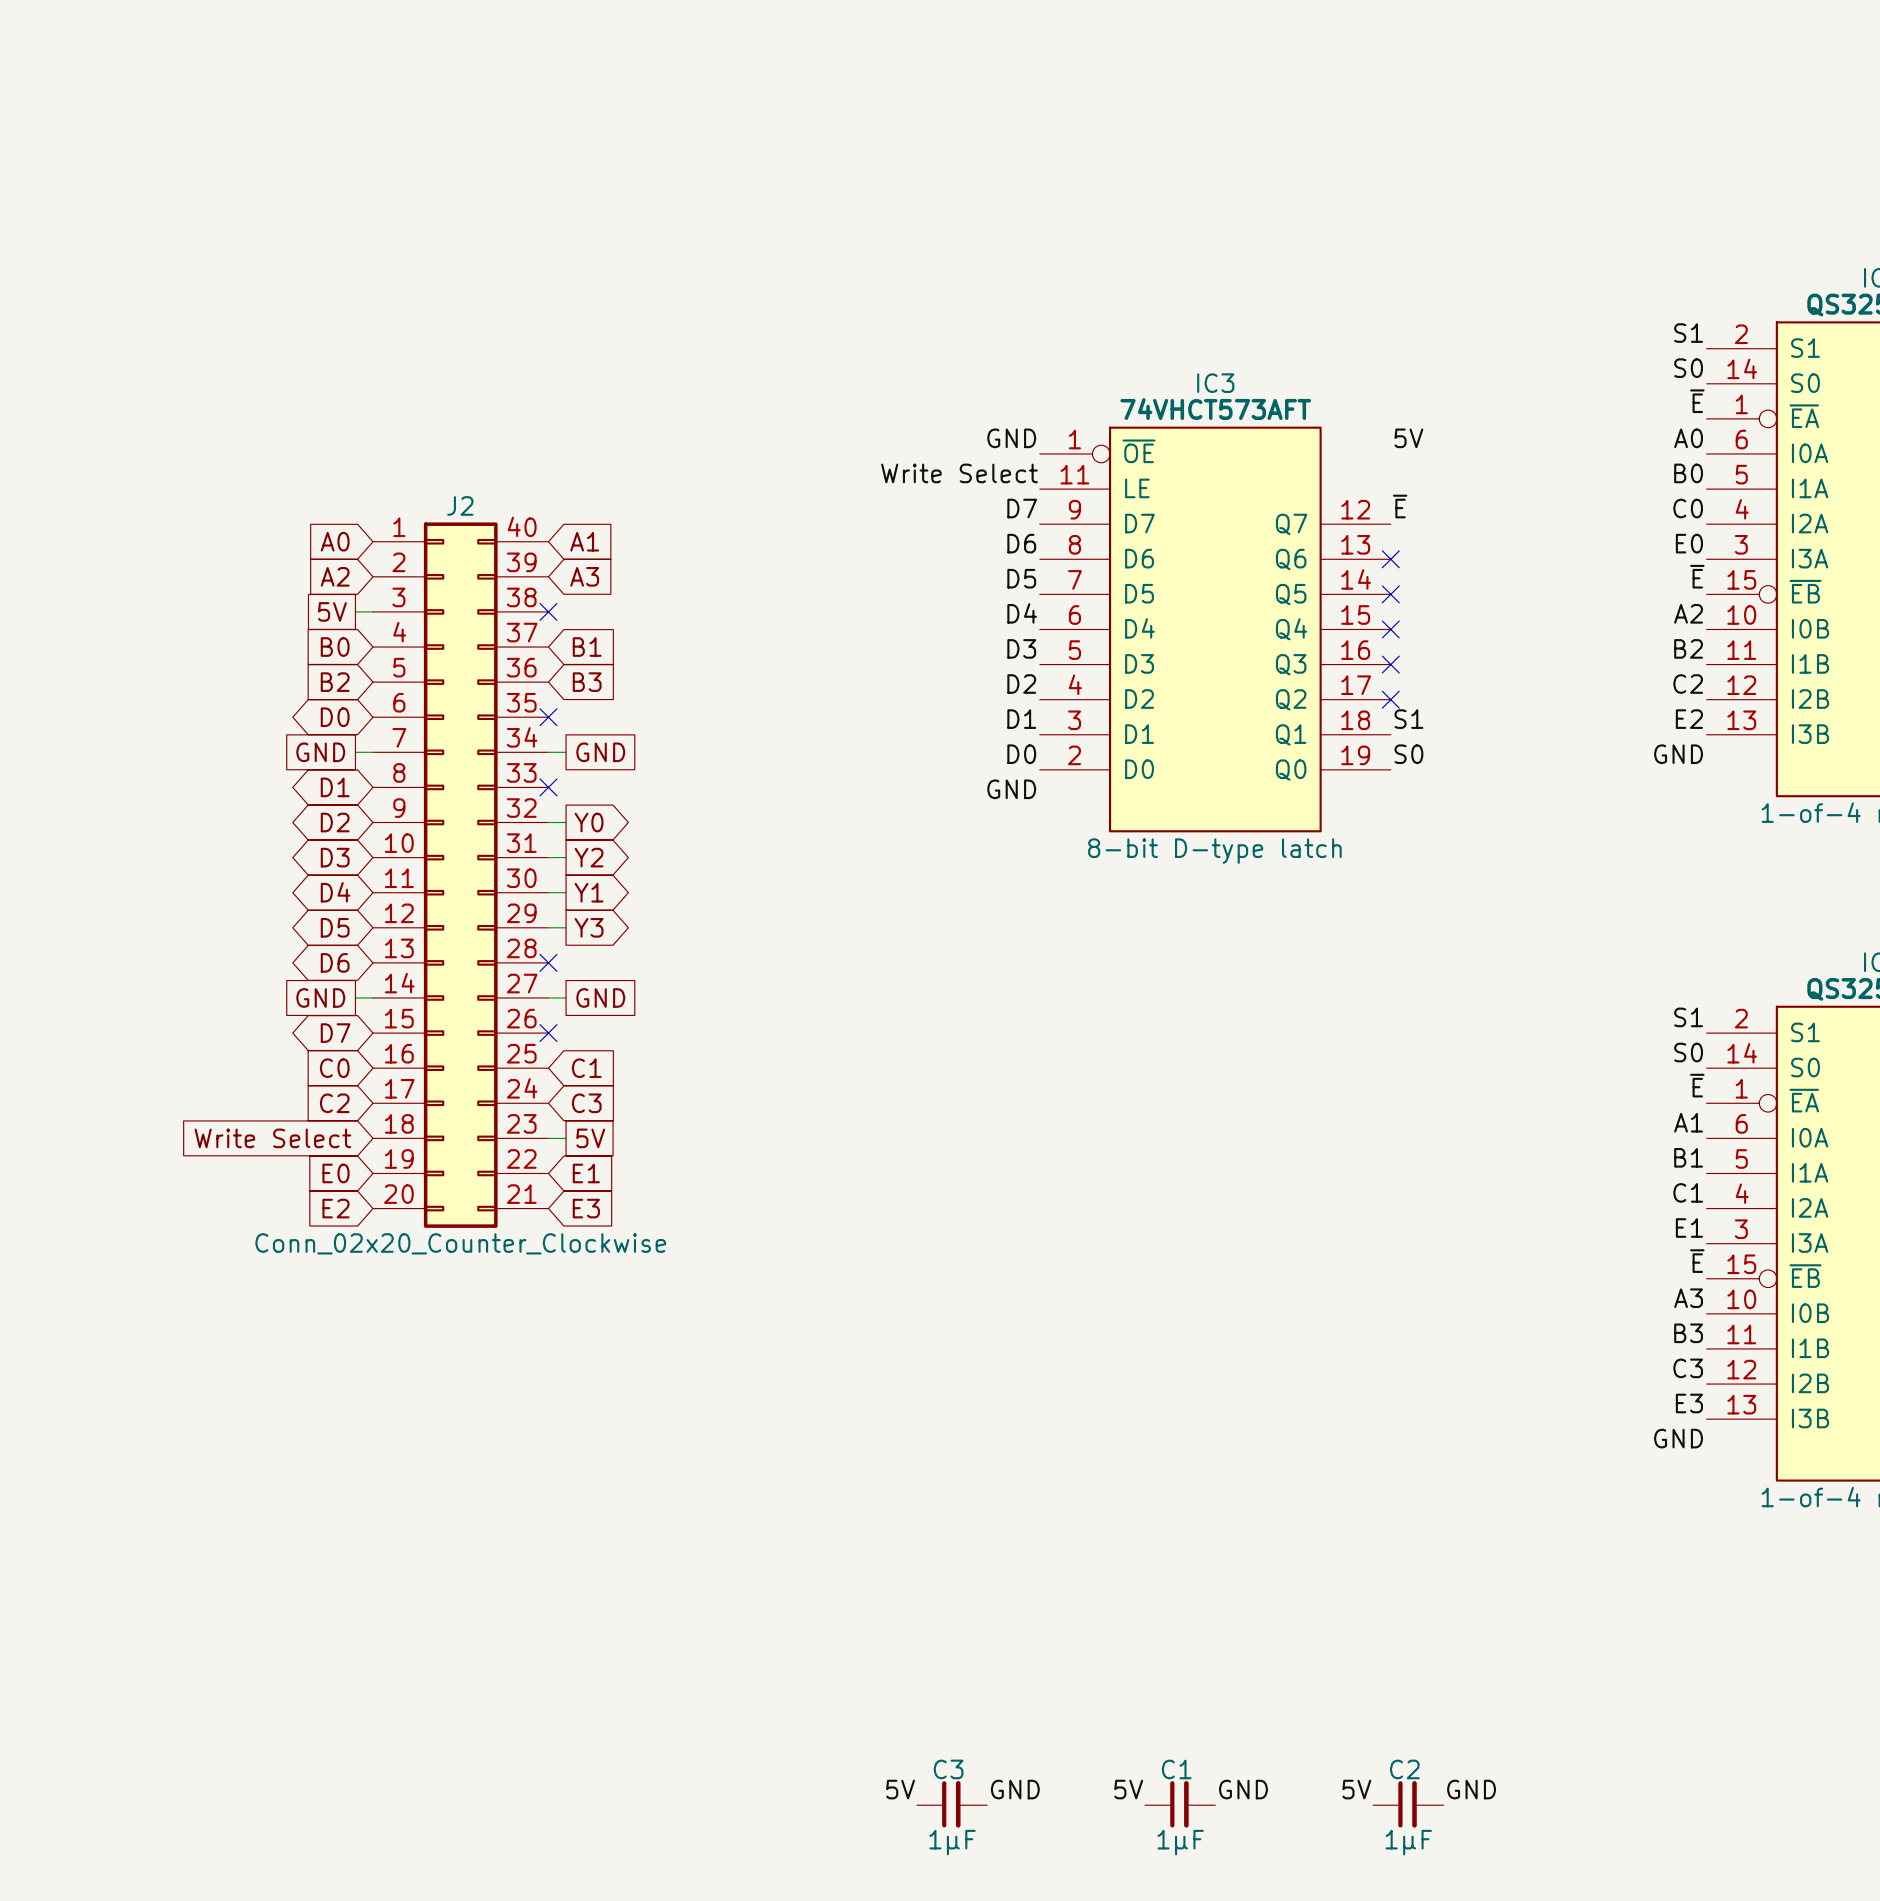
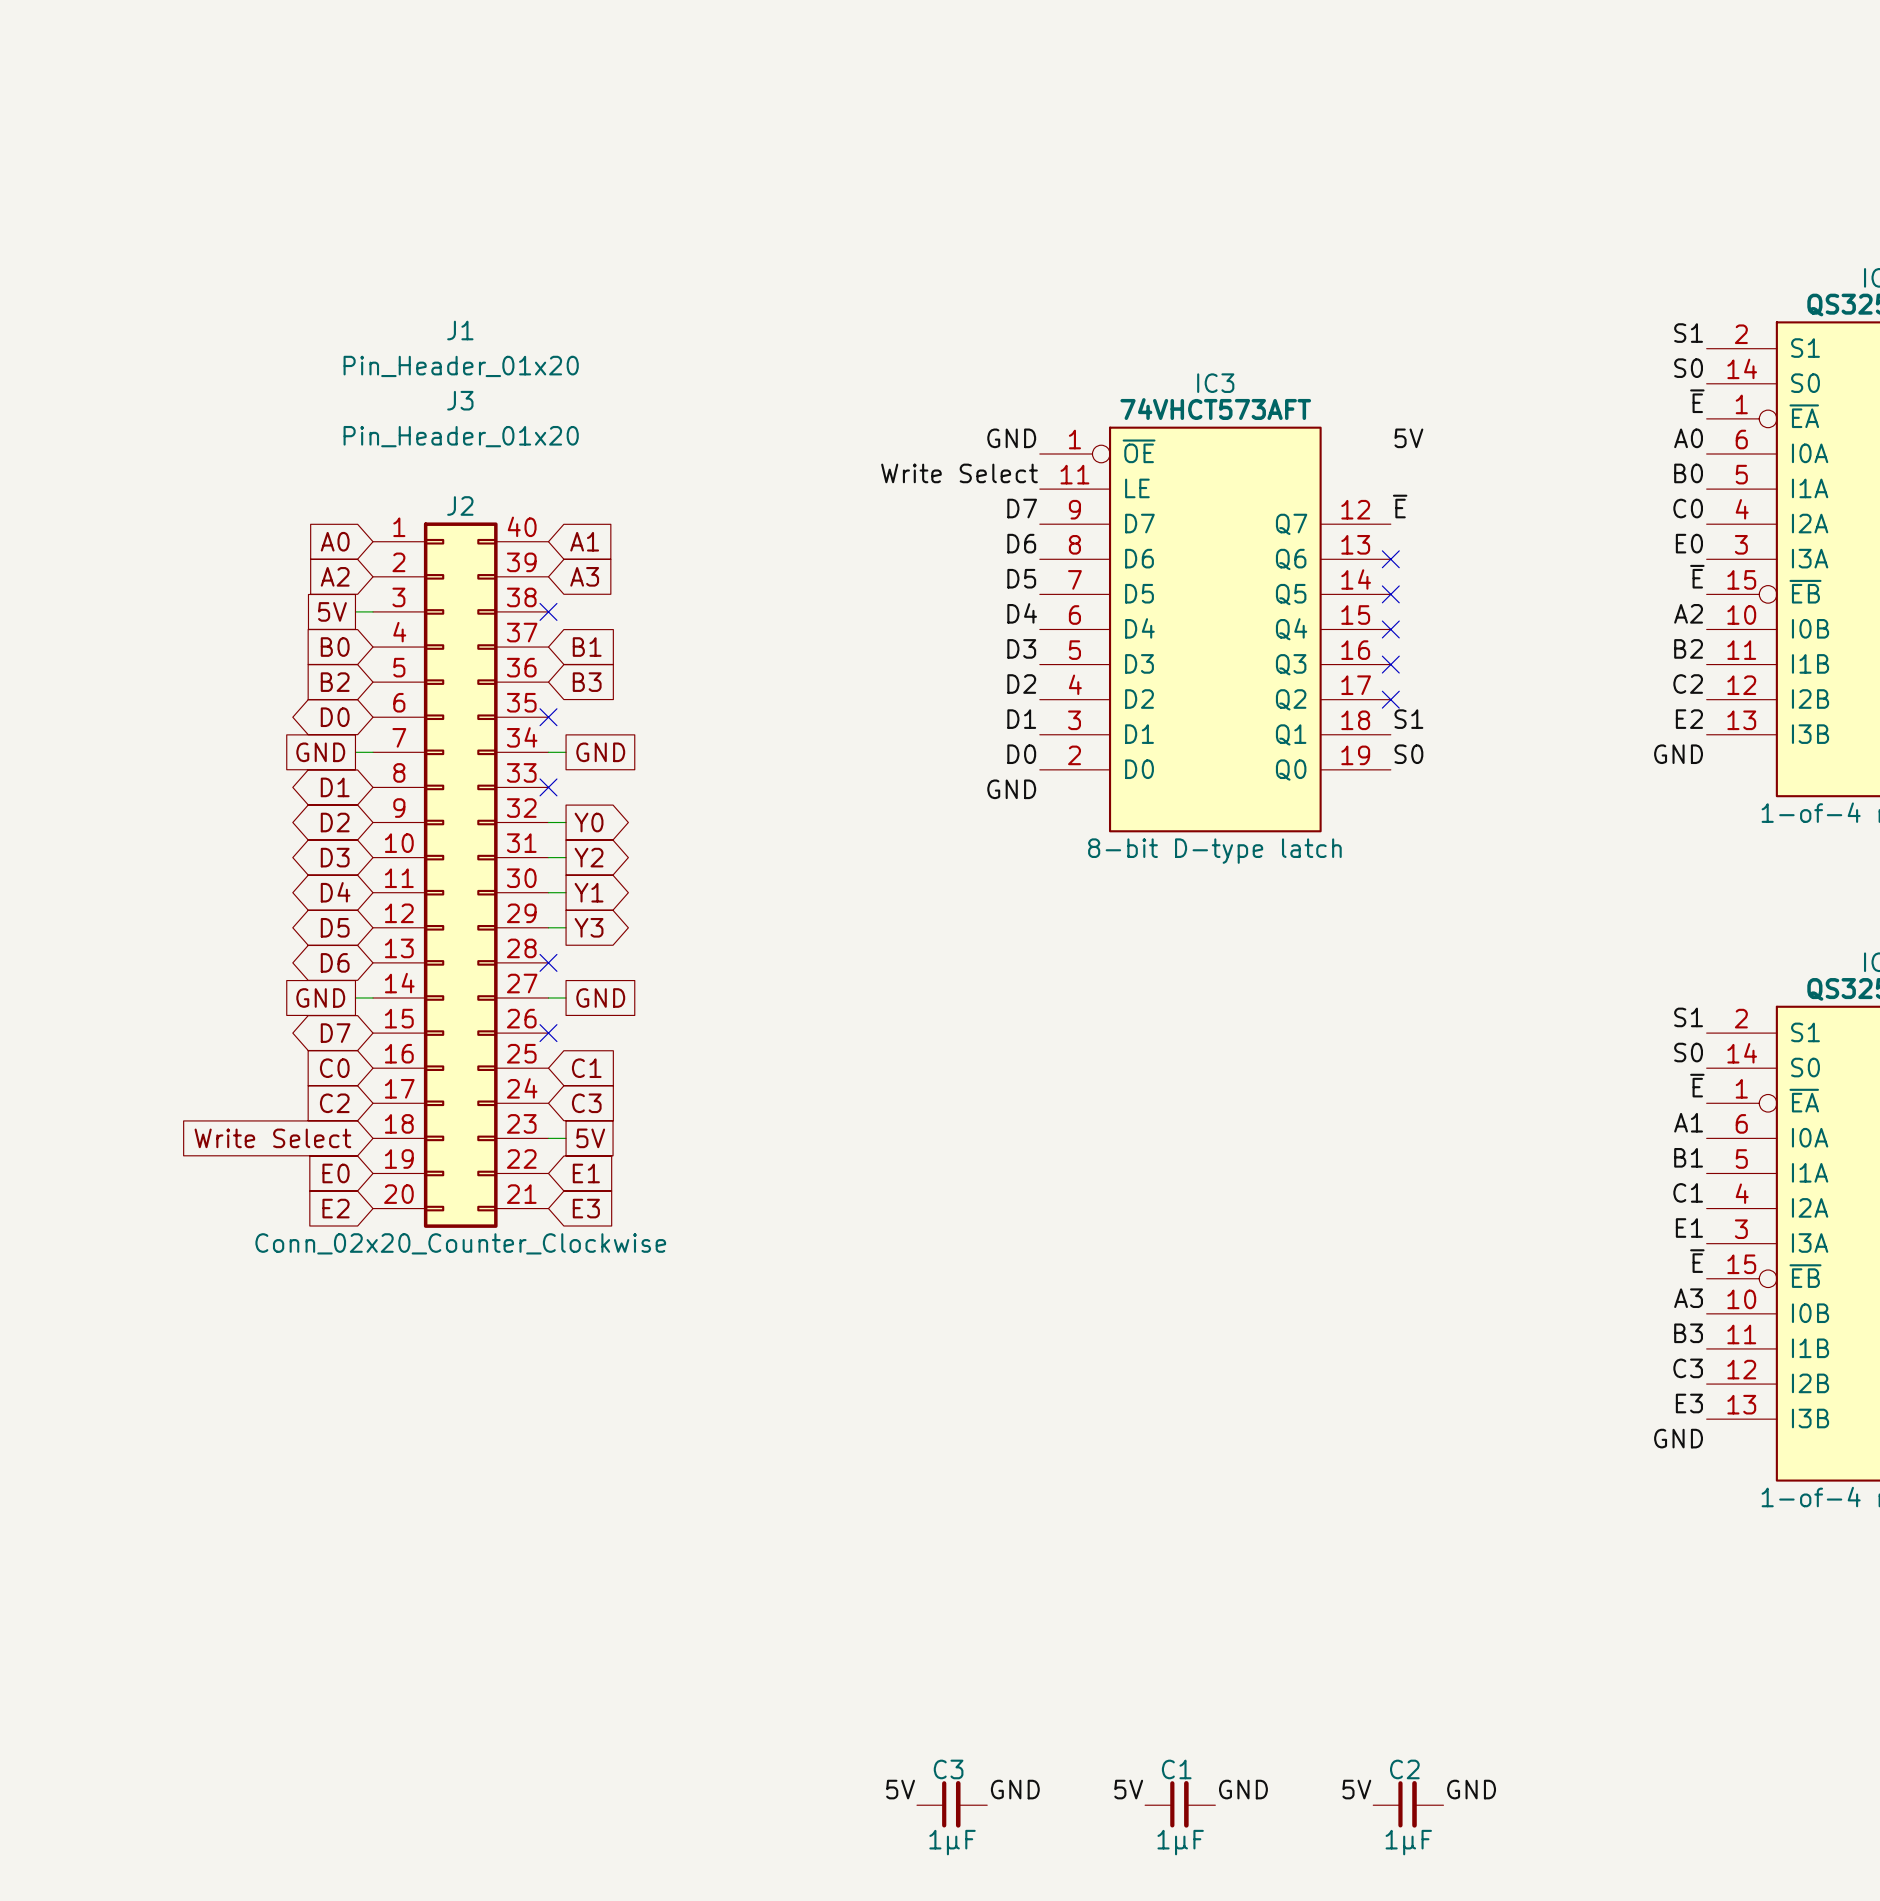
J1: none -> Pin_Header_01x20 (461, 348)
J3: none -> Pin_Header_01x20 (461, 419)

